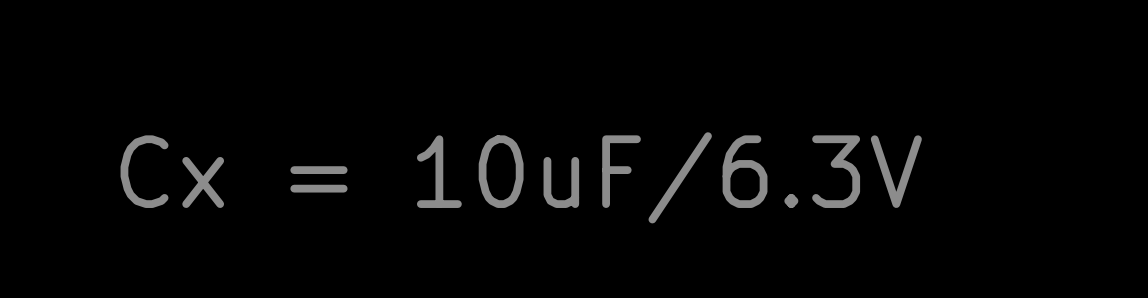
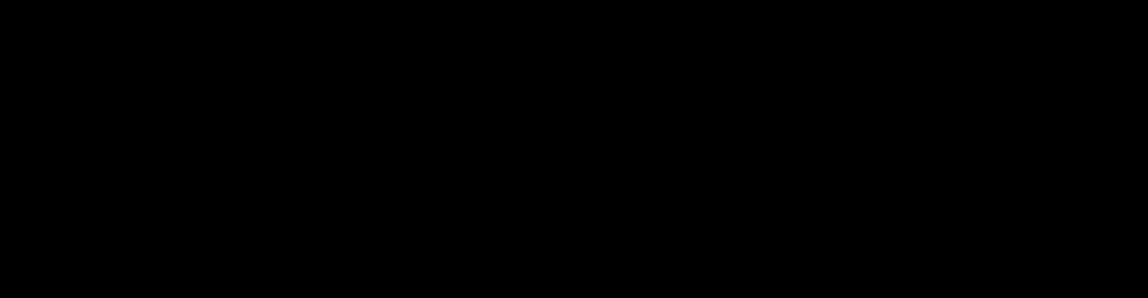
text: Cx = 10uF/6.3V (521, 177) -> none

